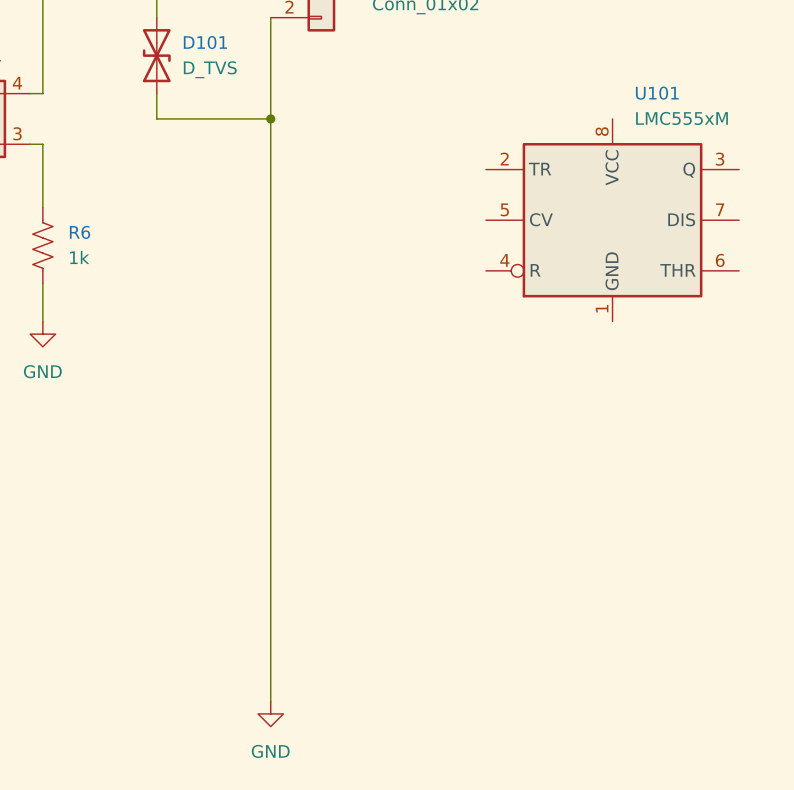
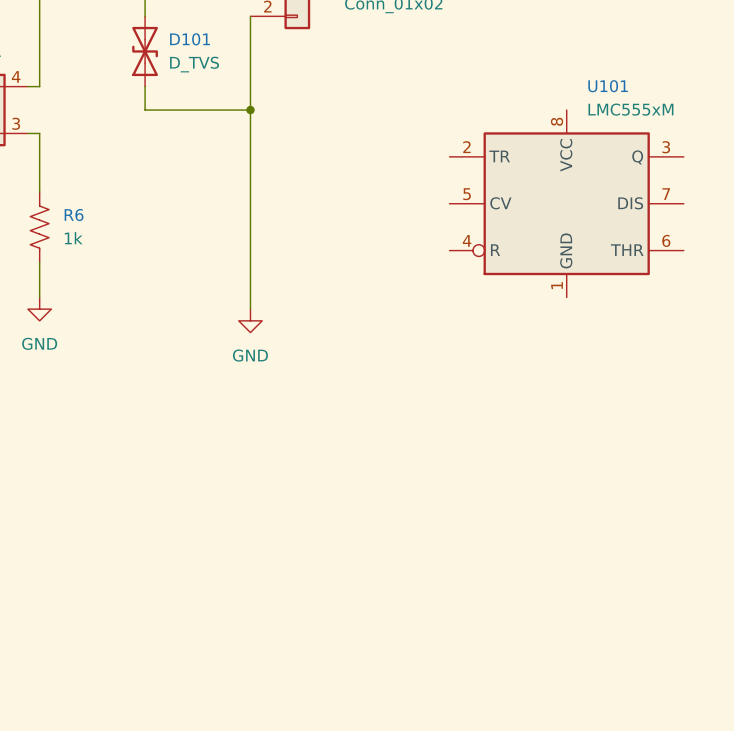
wire: (270, 334) (270, 701) -> none
power symbol: none -> GND (250, 320)
power symbol: GND (270, 713) -> none

